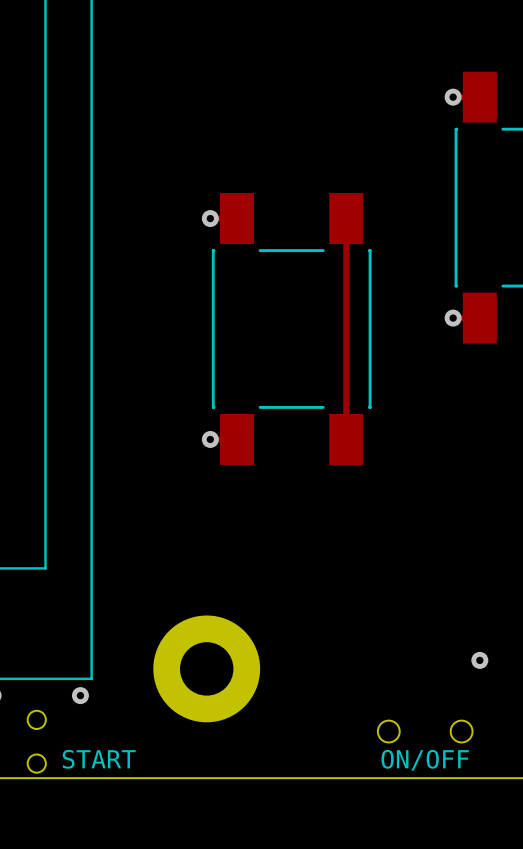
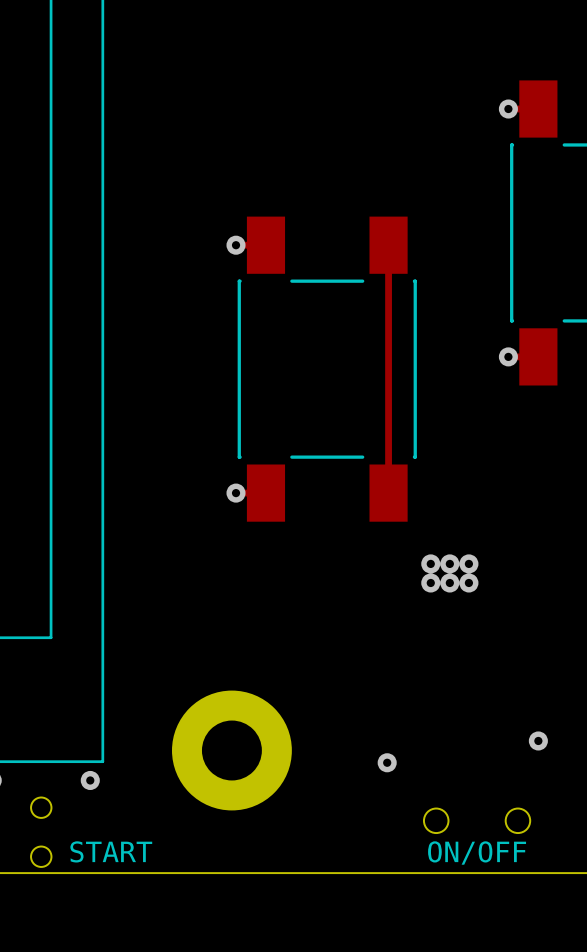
via: none -> (430, 563)
via: none -> (449, 563)
via: none -> (468, 563)
via: none -> (430, 582)
via: none -> (449, 582)
via: none -> (468, 582)
via: none -> (387, 762)

